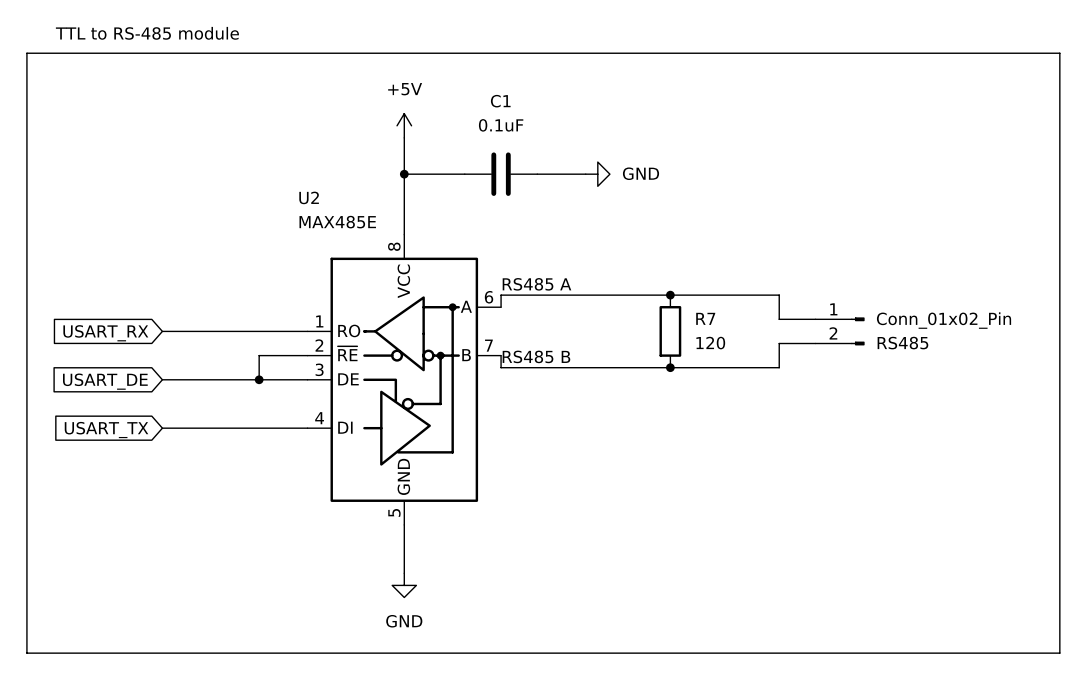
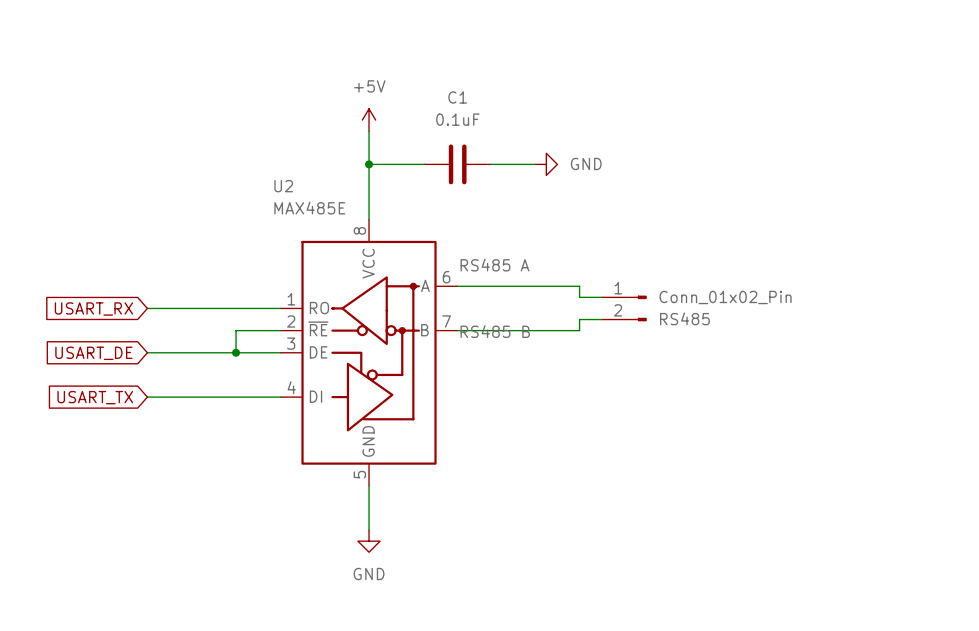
text: TTL to RS-485 module (147, 33) -> none
line: (26, 53) (1059, 53) (1059, 653) (26, 653) (26, 53) -> none
junction: (670, 295) -> none
wire: (501, 307) (501, 295) (779, 295) (779, 319) (815, 319) -> (457, 286) (579, 286) (579, 297) (601, 297)
R7: 120 (670, 331) -> none
RS485 position: (840, 331) -> (624, 308)
wire: (815, 343) (779, 343) (779, 367) (501, 367) (501, 355) -> (601, 319) (579, 319) (579, 330) (457, 330)
junction: (670, 367) -> none

